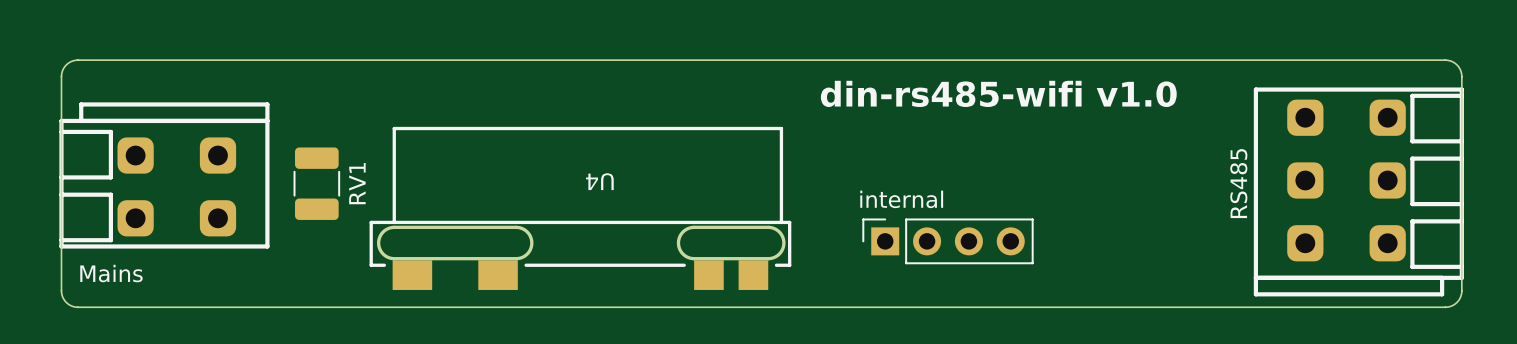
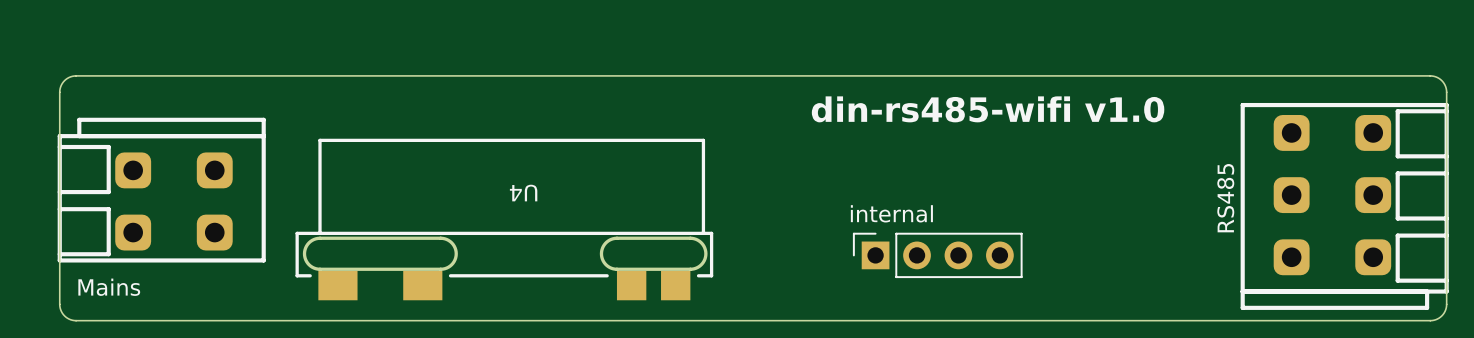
RV1: (316, 183) -> none
U4 position: (580, 208) -> (504, 219)

